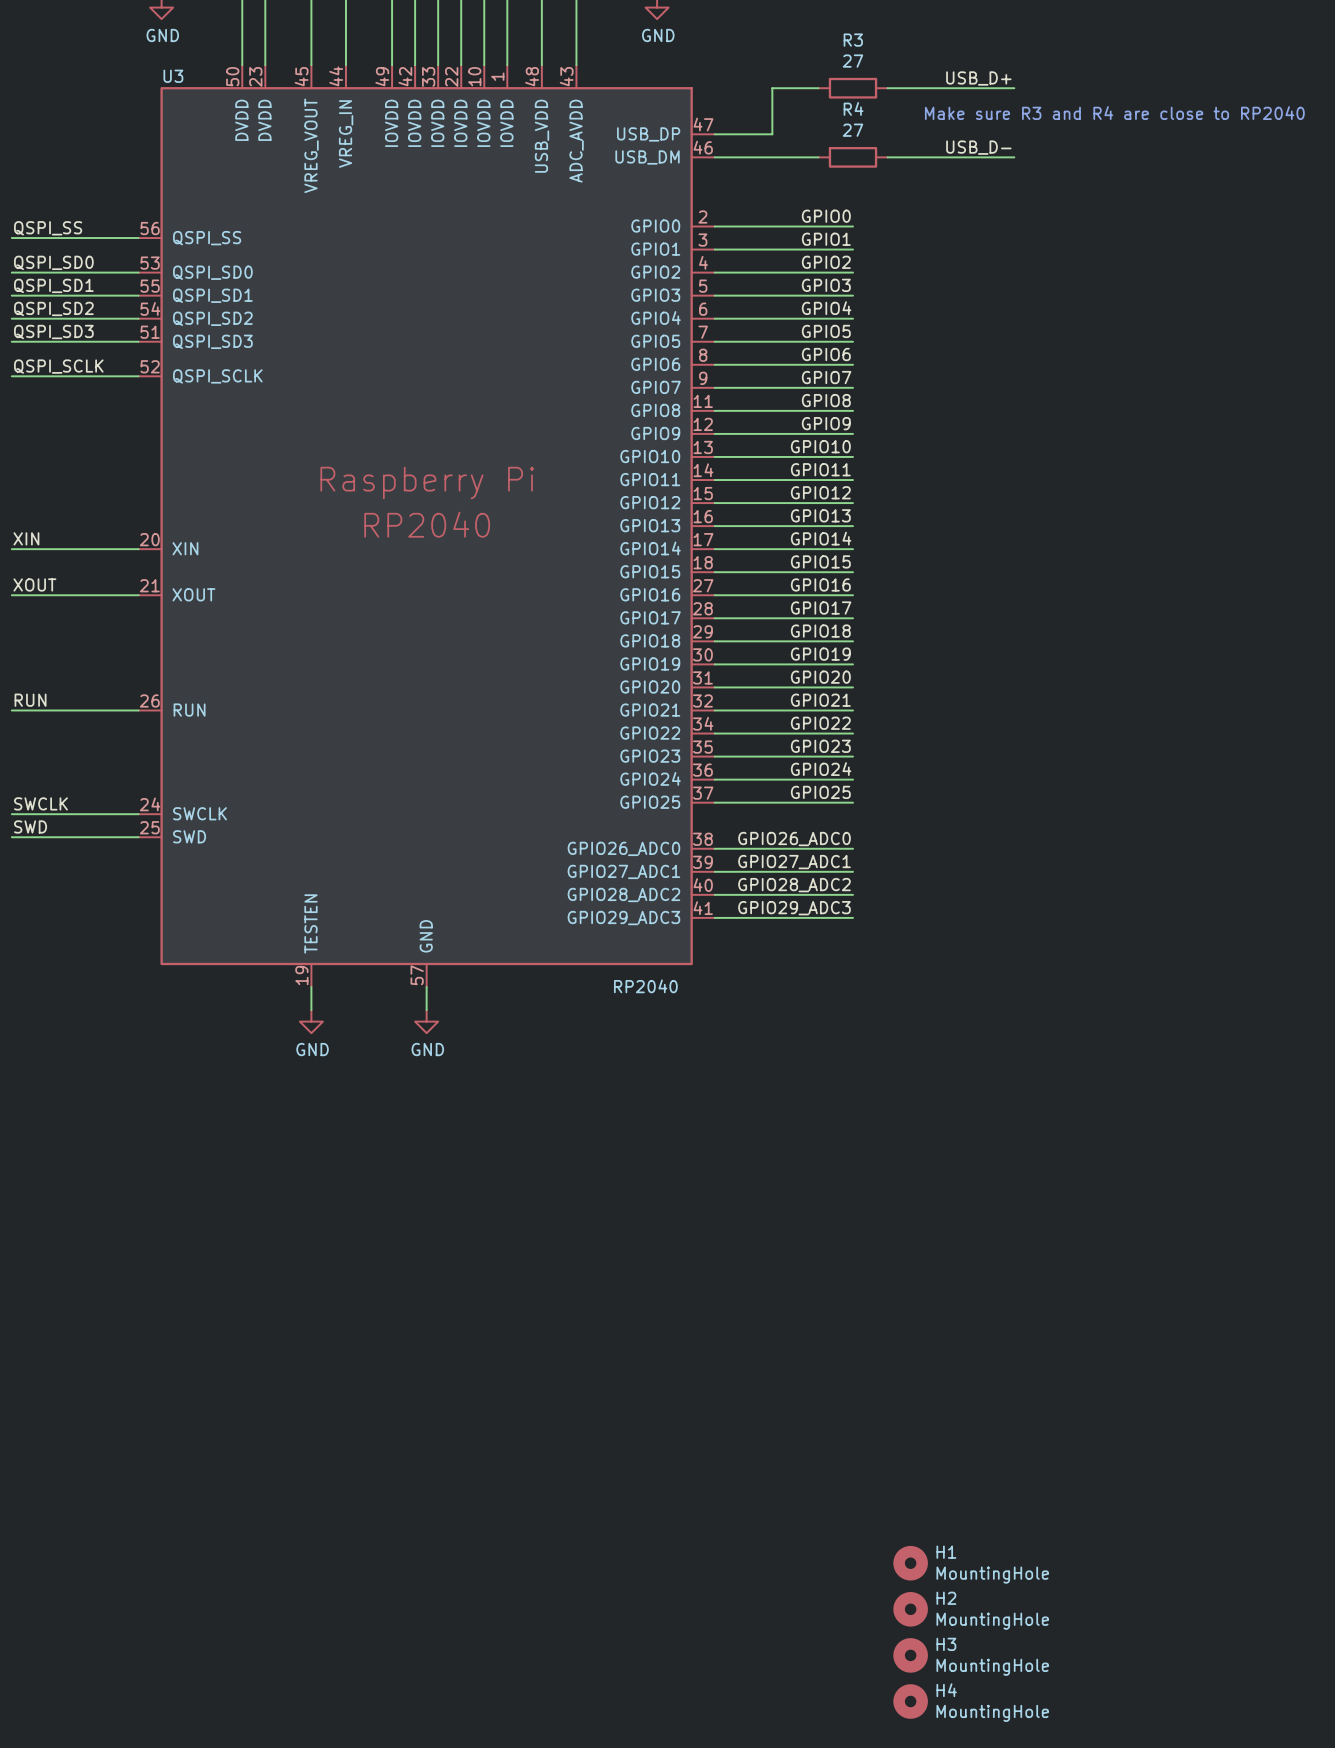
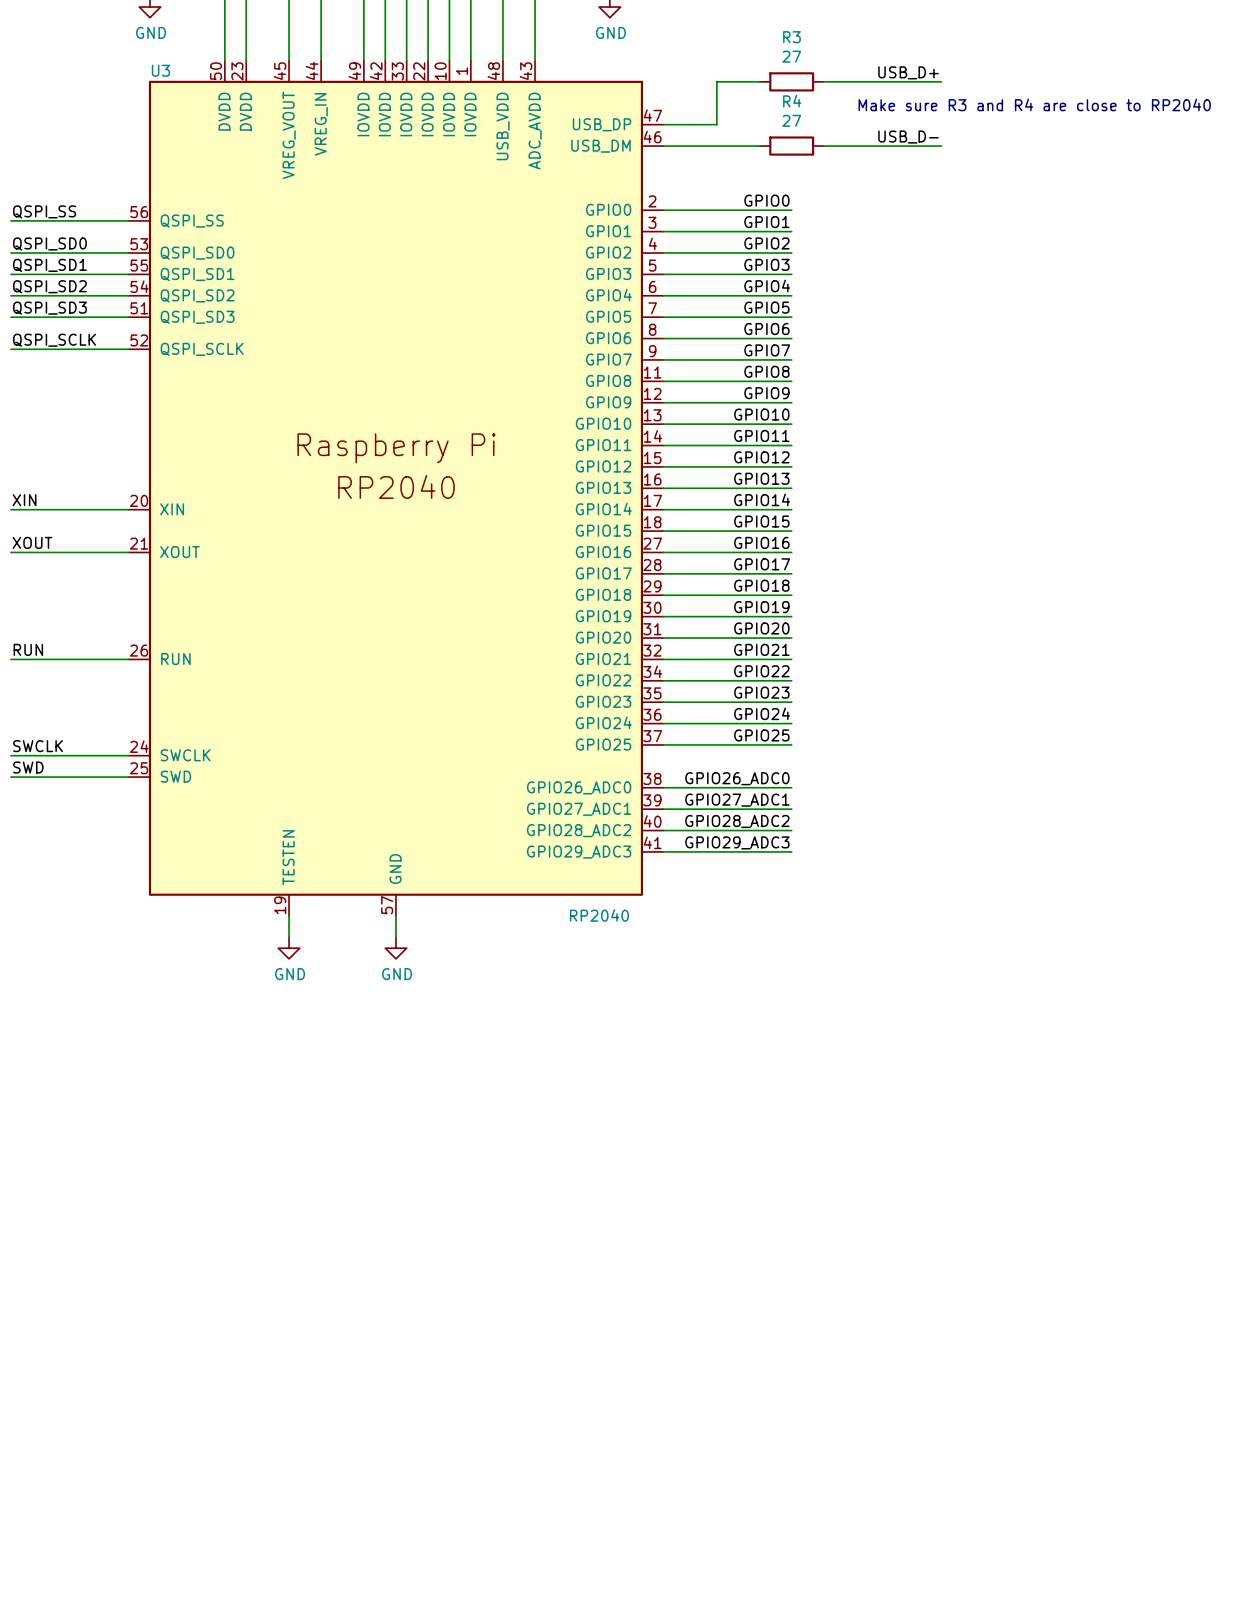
H1: MountingHole (910, 1563) -> none
H2: MountingHole (910, 1609) -> none
H3: MountingHole (910, 1655) -> none
H4: MountingHole (910, 1701) -> none

